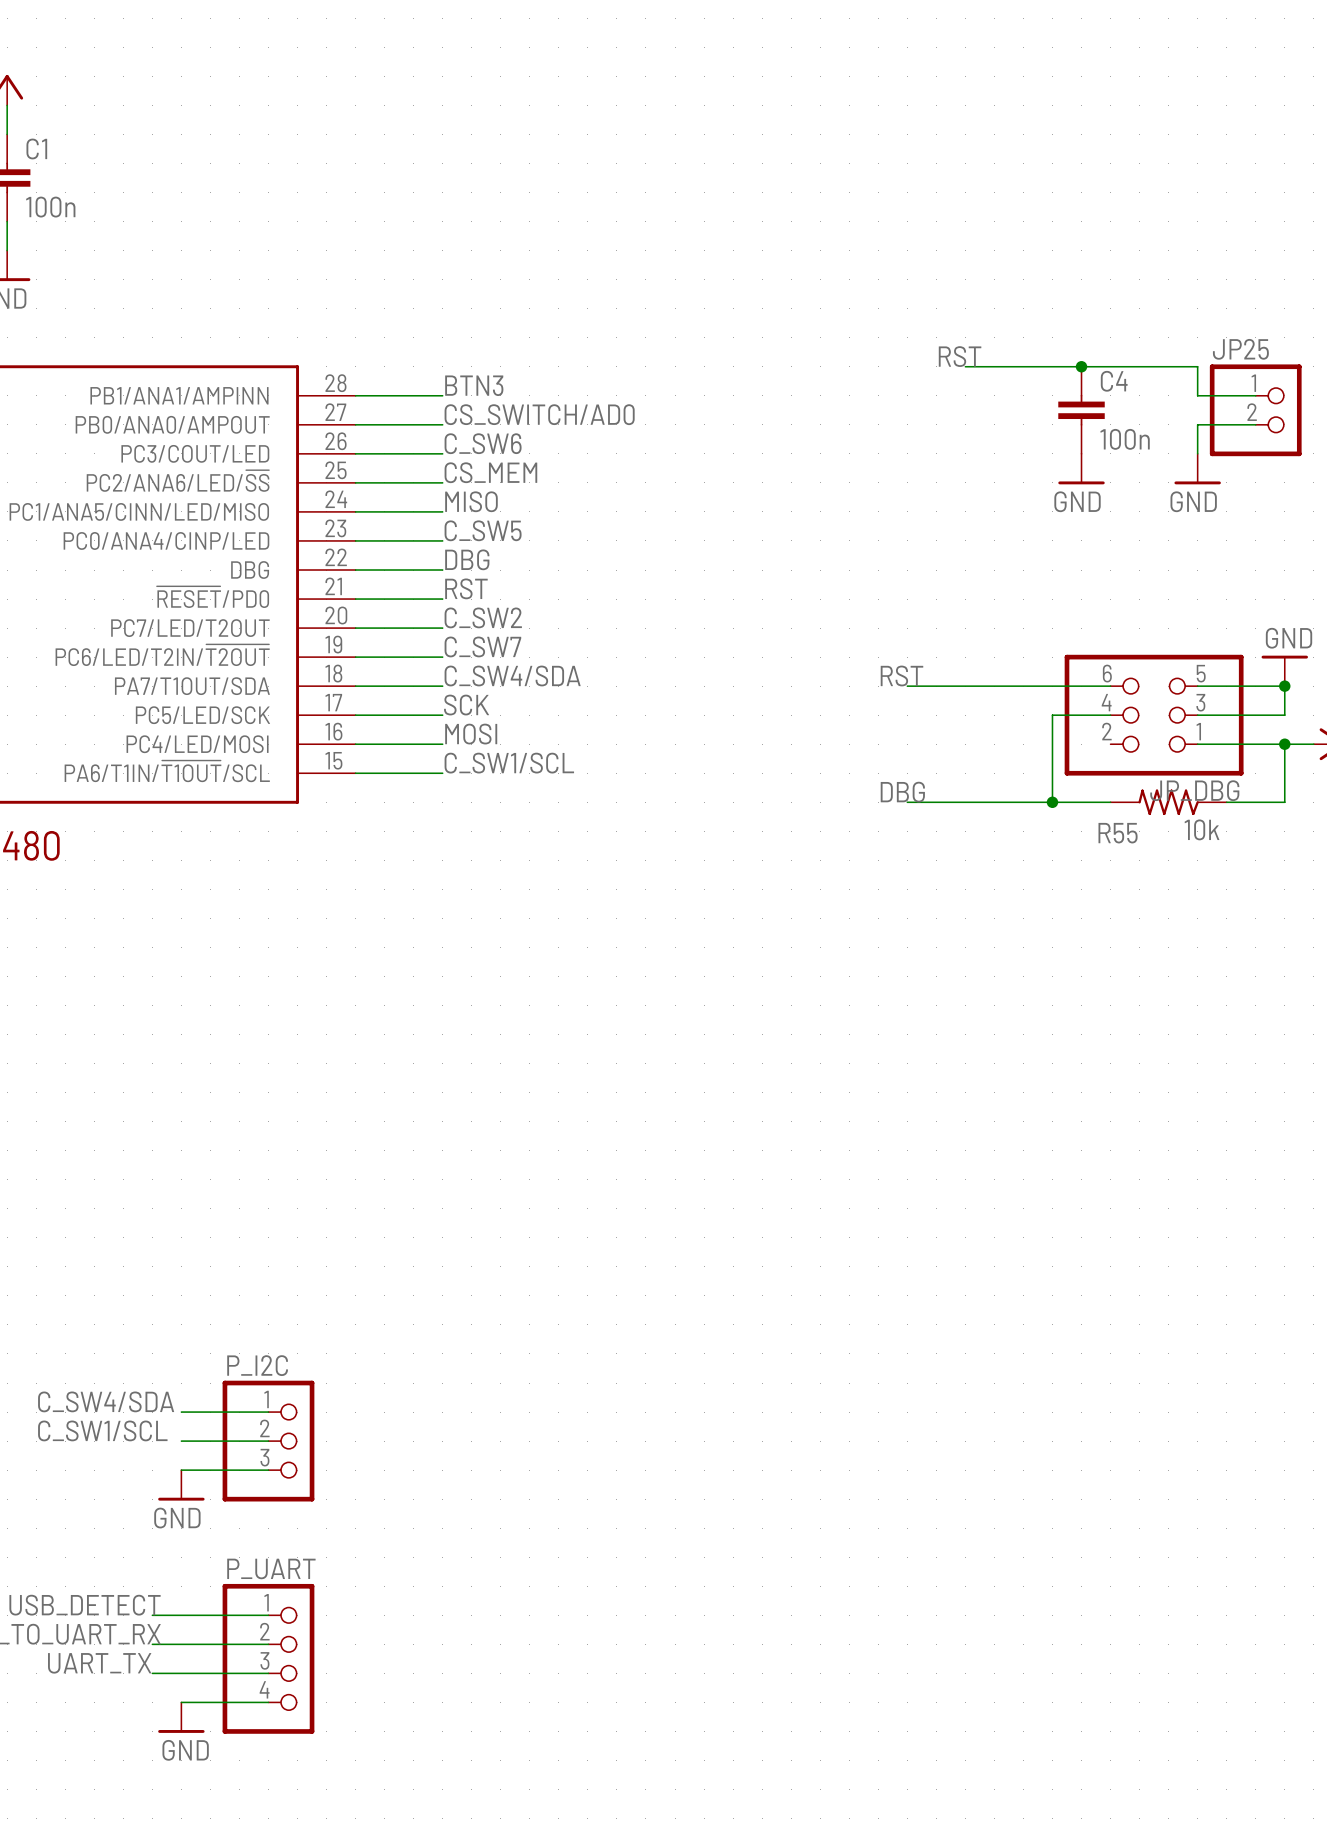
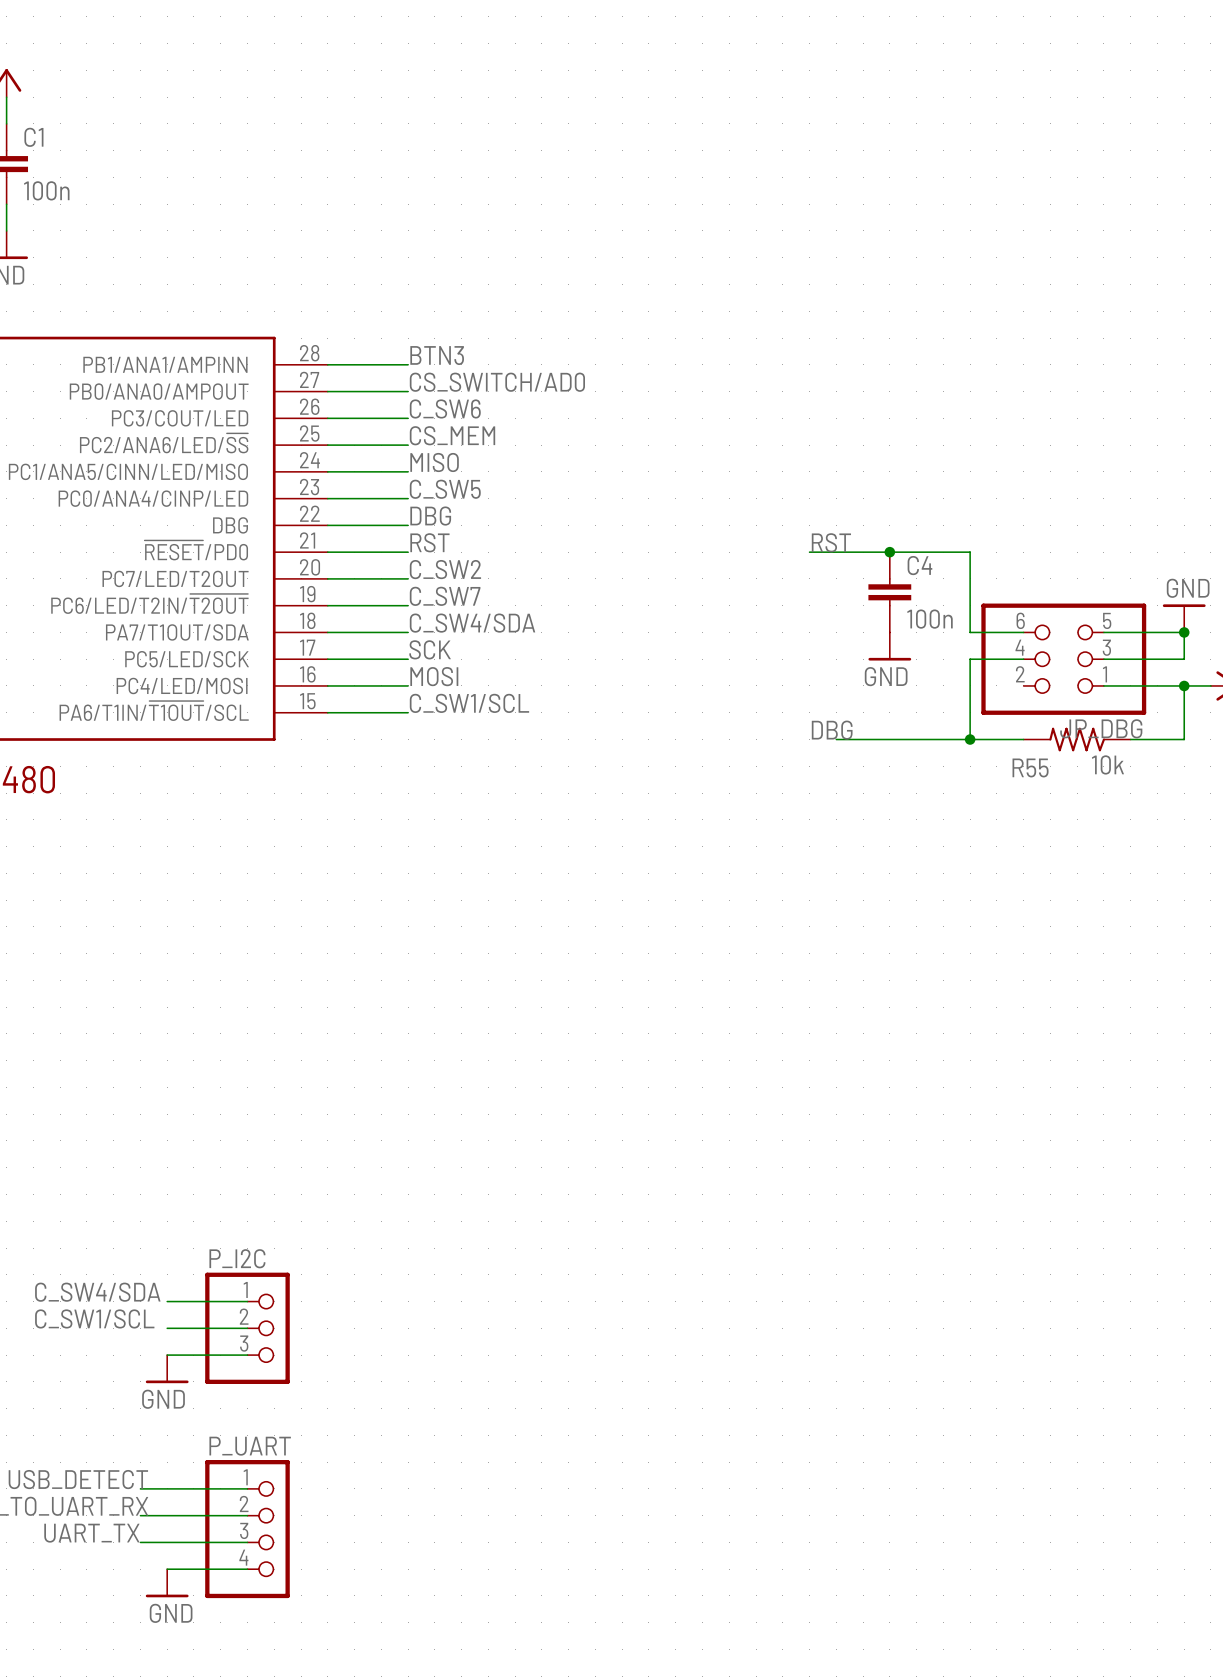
label: RST (960, 356) -> none
wire: (965, 366) (1197, 366) (1197, 395) (1255, 395) -> none
junction: (1081, 366) -> none
C4 position: (1081, 410) -> (889, 592)
JP25: (1255, 410) -> none
wire: (1255, 424) (1197, 424) (1197, 453) -> none
power symbol: GND (1081, 469) -> none
power symbol: GND (1197, 469) -> none
junction: none -> (889, 552)
label position: RST (901, 675) -> RST (831, 542)
wire: (907, 686) (1052, 686) -> (809, 552) (970, 552) (970, 632)
power symbol: none -> GND (889, 646)

